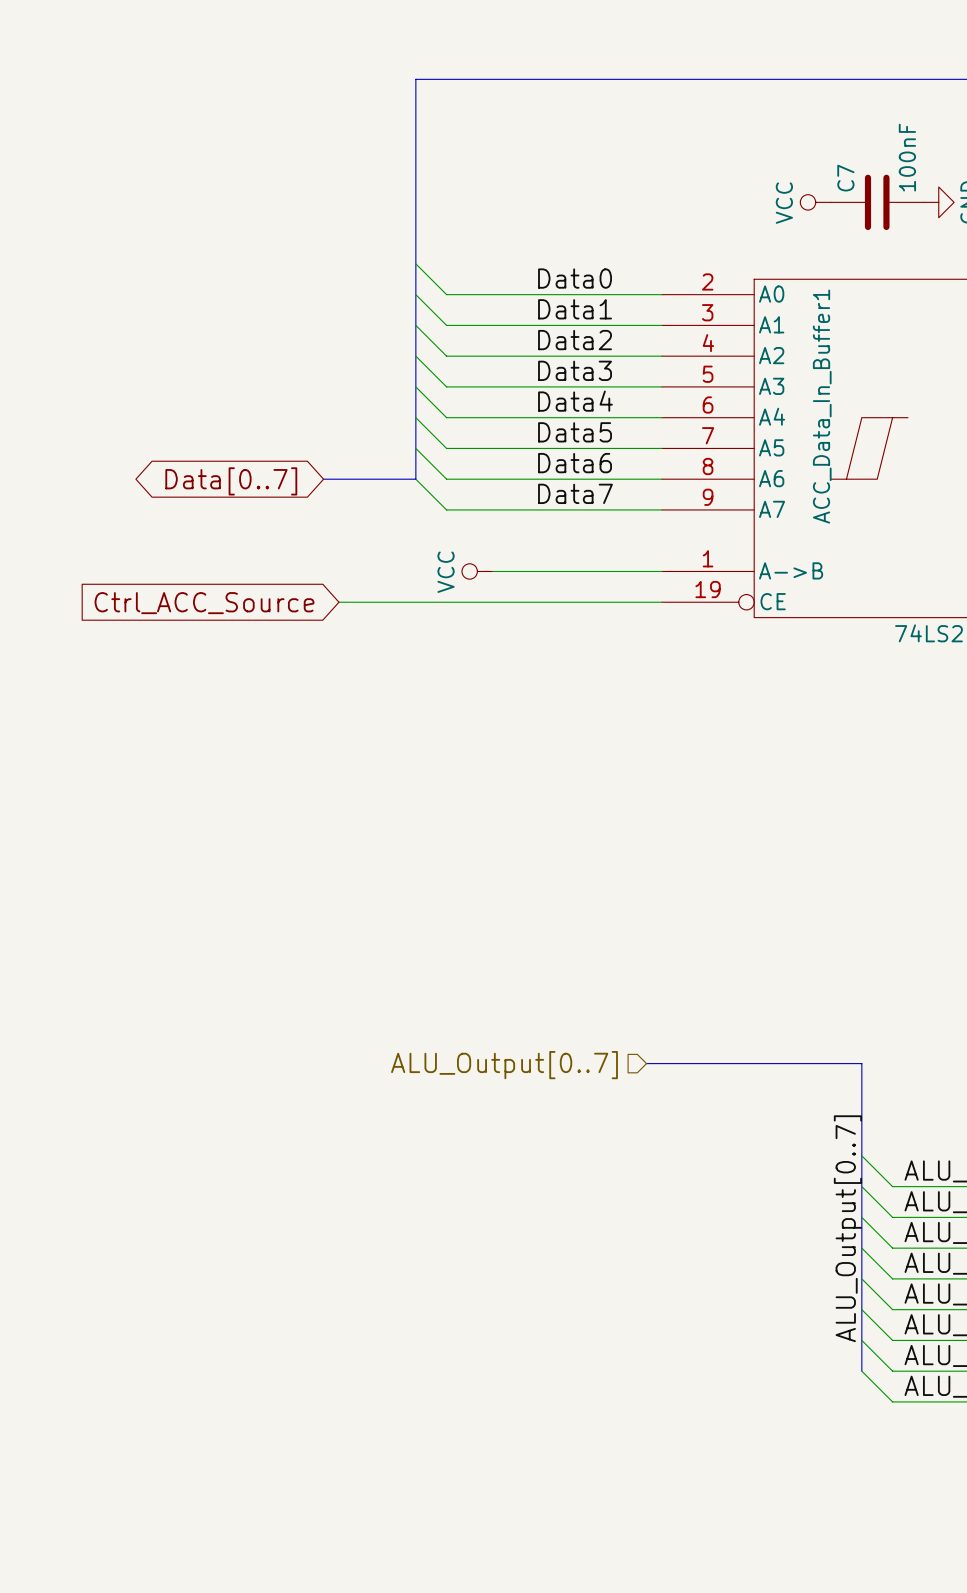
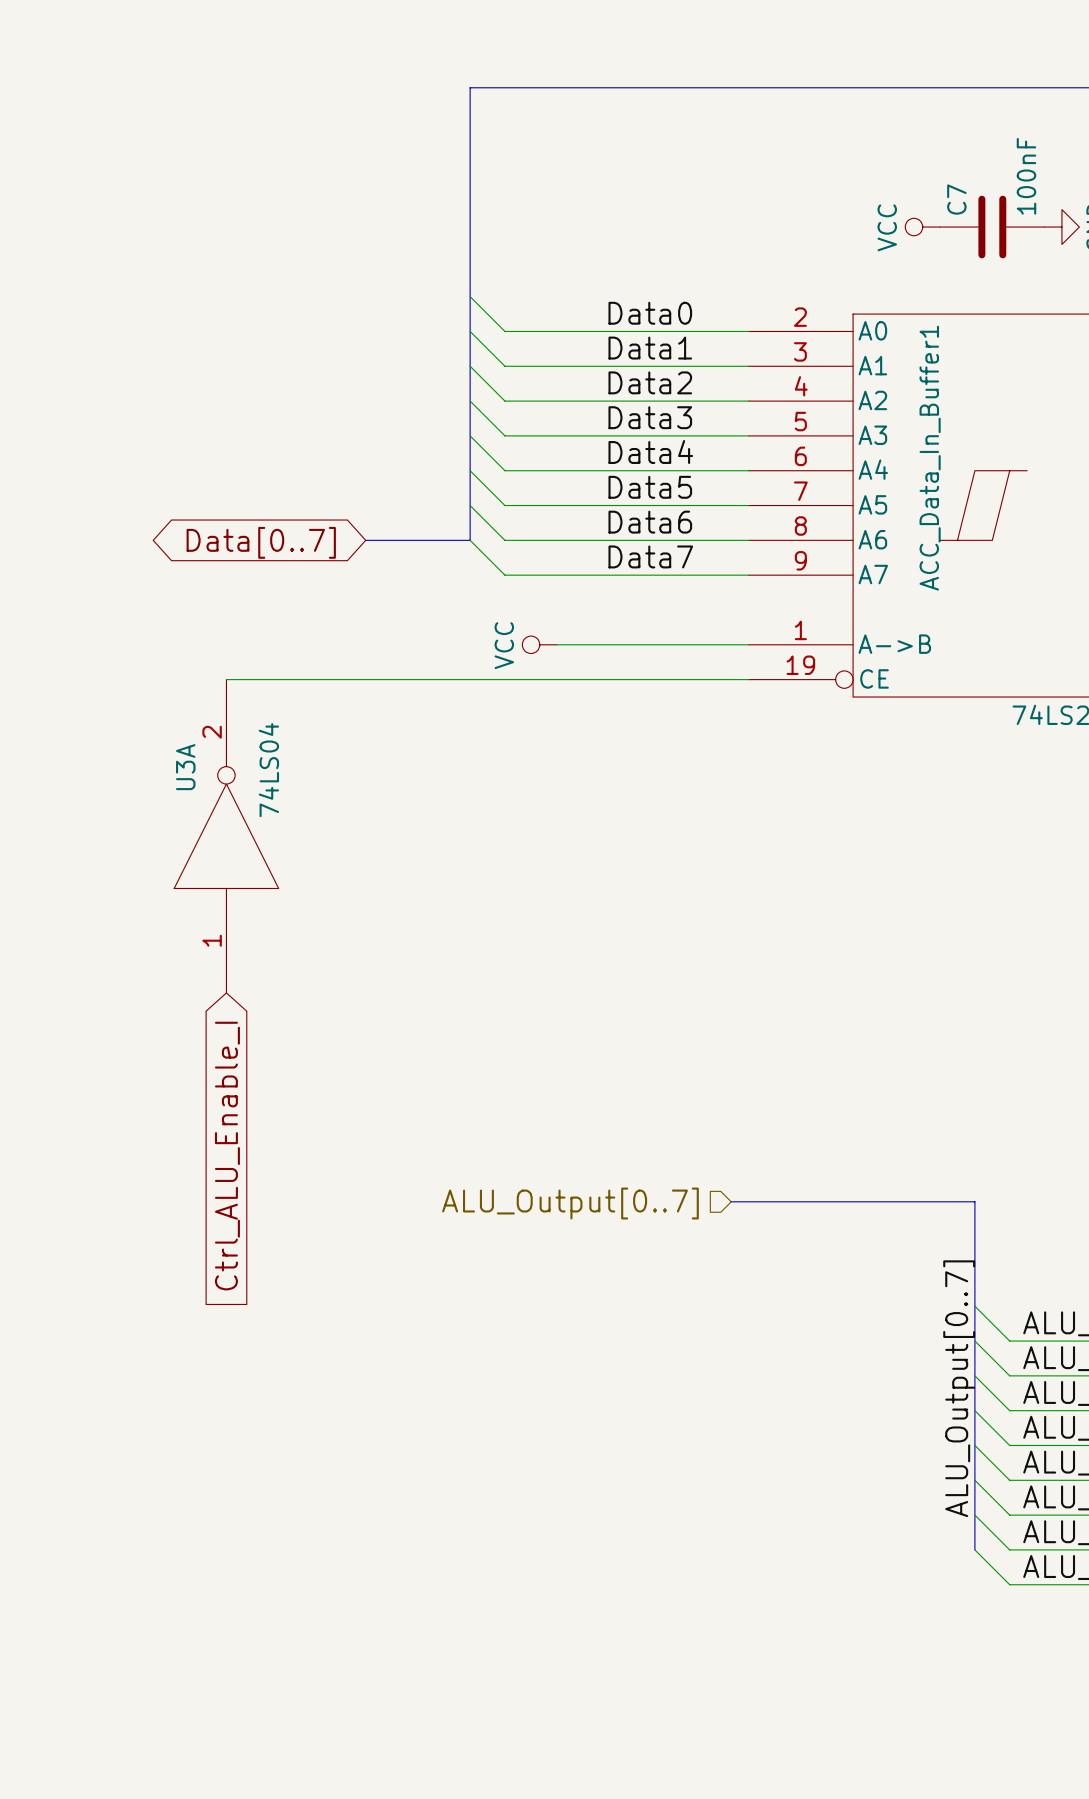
wire: none -> (226, 679) (383, 679)
global label: Ctrl_ACC_Source (204, 603) -> none
U3A: none -> 74LS04 (226, 836)
global label: none -> Ctrl_ALU_Enable_I (227, 1156)

